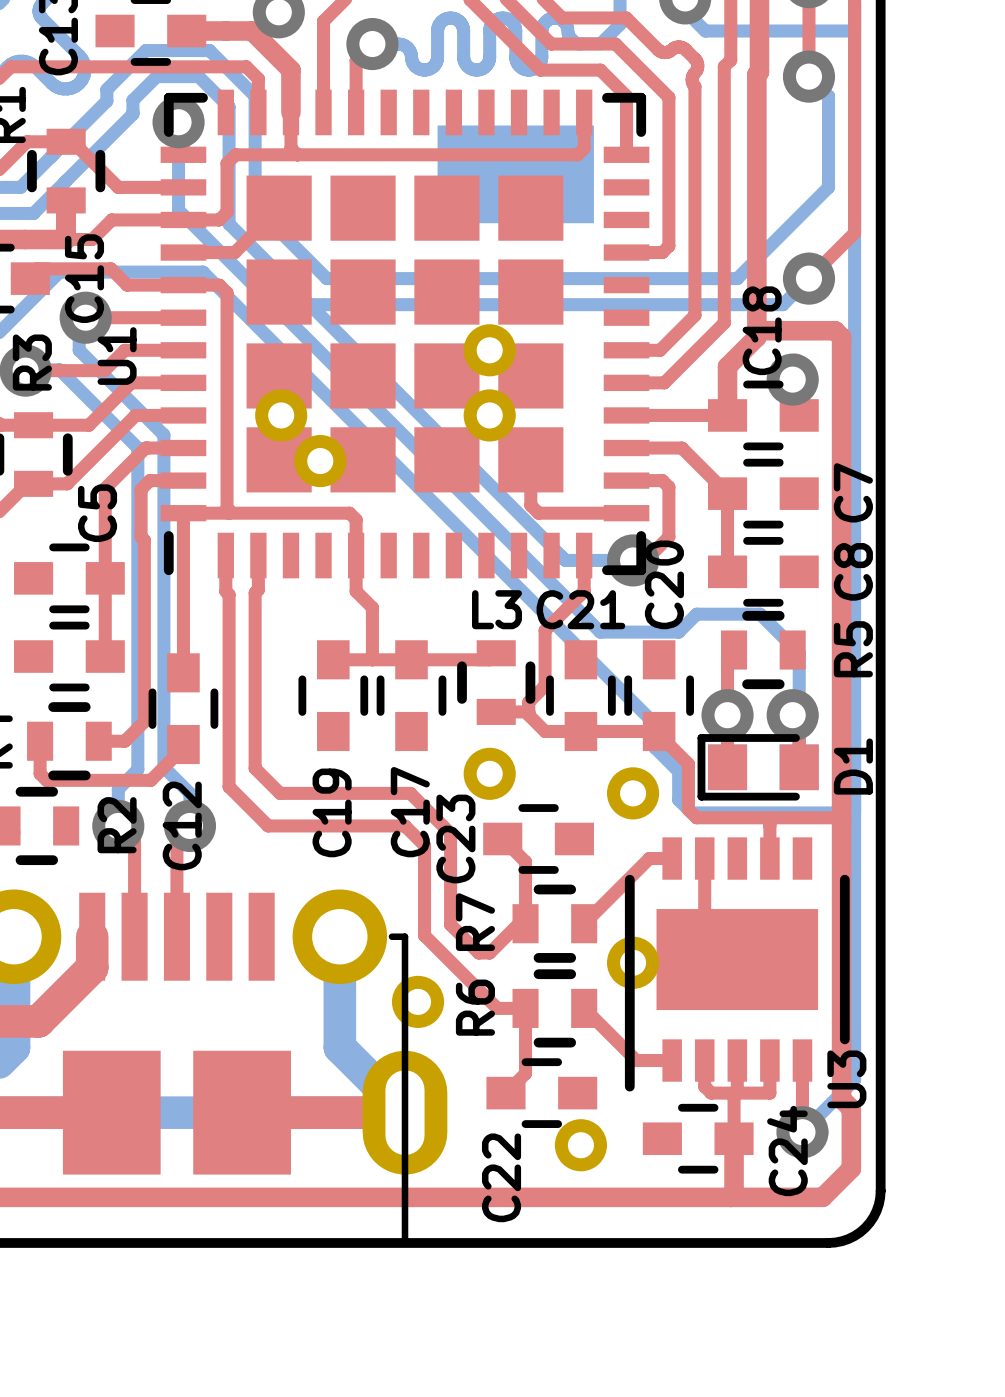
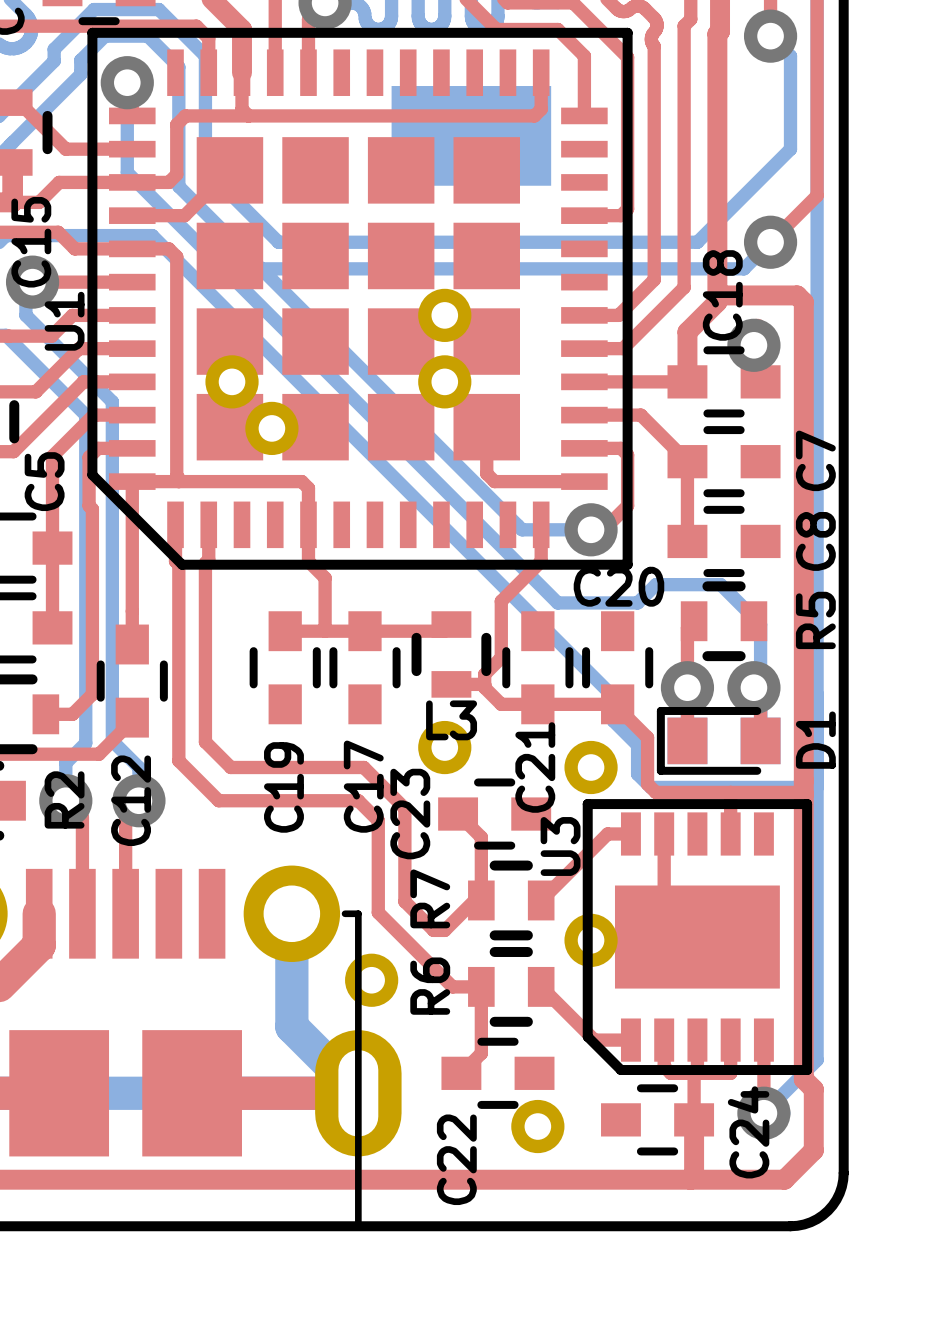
U1 footprint: [160, 89, 650, 579] -> [87, 27, 633, 570]
C20 name rotation: 0° (664, 584) -> 90° clockwise (618, 586)
L3 name position: L3 (496, 609) -> L3 (451, 720)
C21 name rotation: 0° (580, 609) -> 90° counterclockwise (535, 767)
C21 name position: C21 (580, 609) -> C21 (535, 767)
U3 footprint: [624, 837, 850, 1092] -> [582, 799, 813, 1075]
U3 name position: U3 (846, 1079) -> U3 (560, 846)

